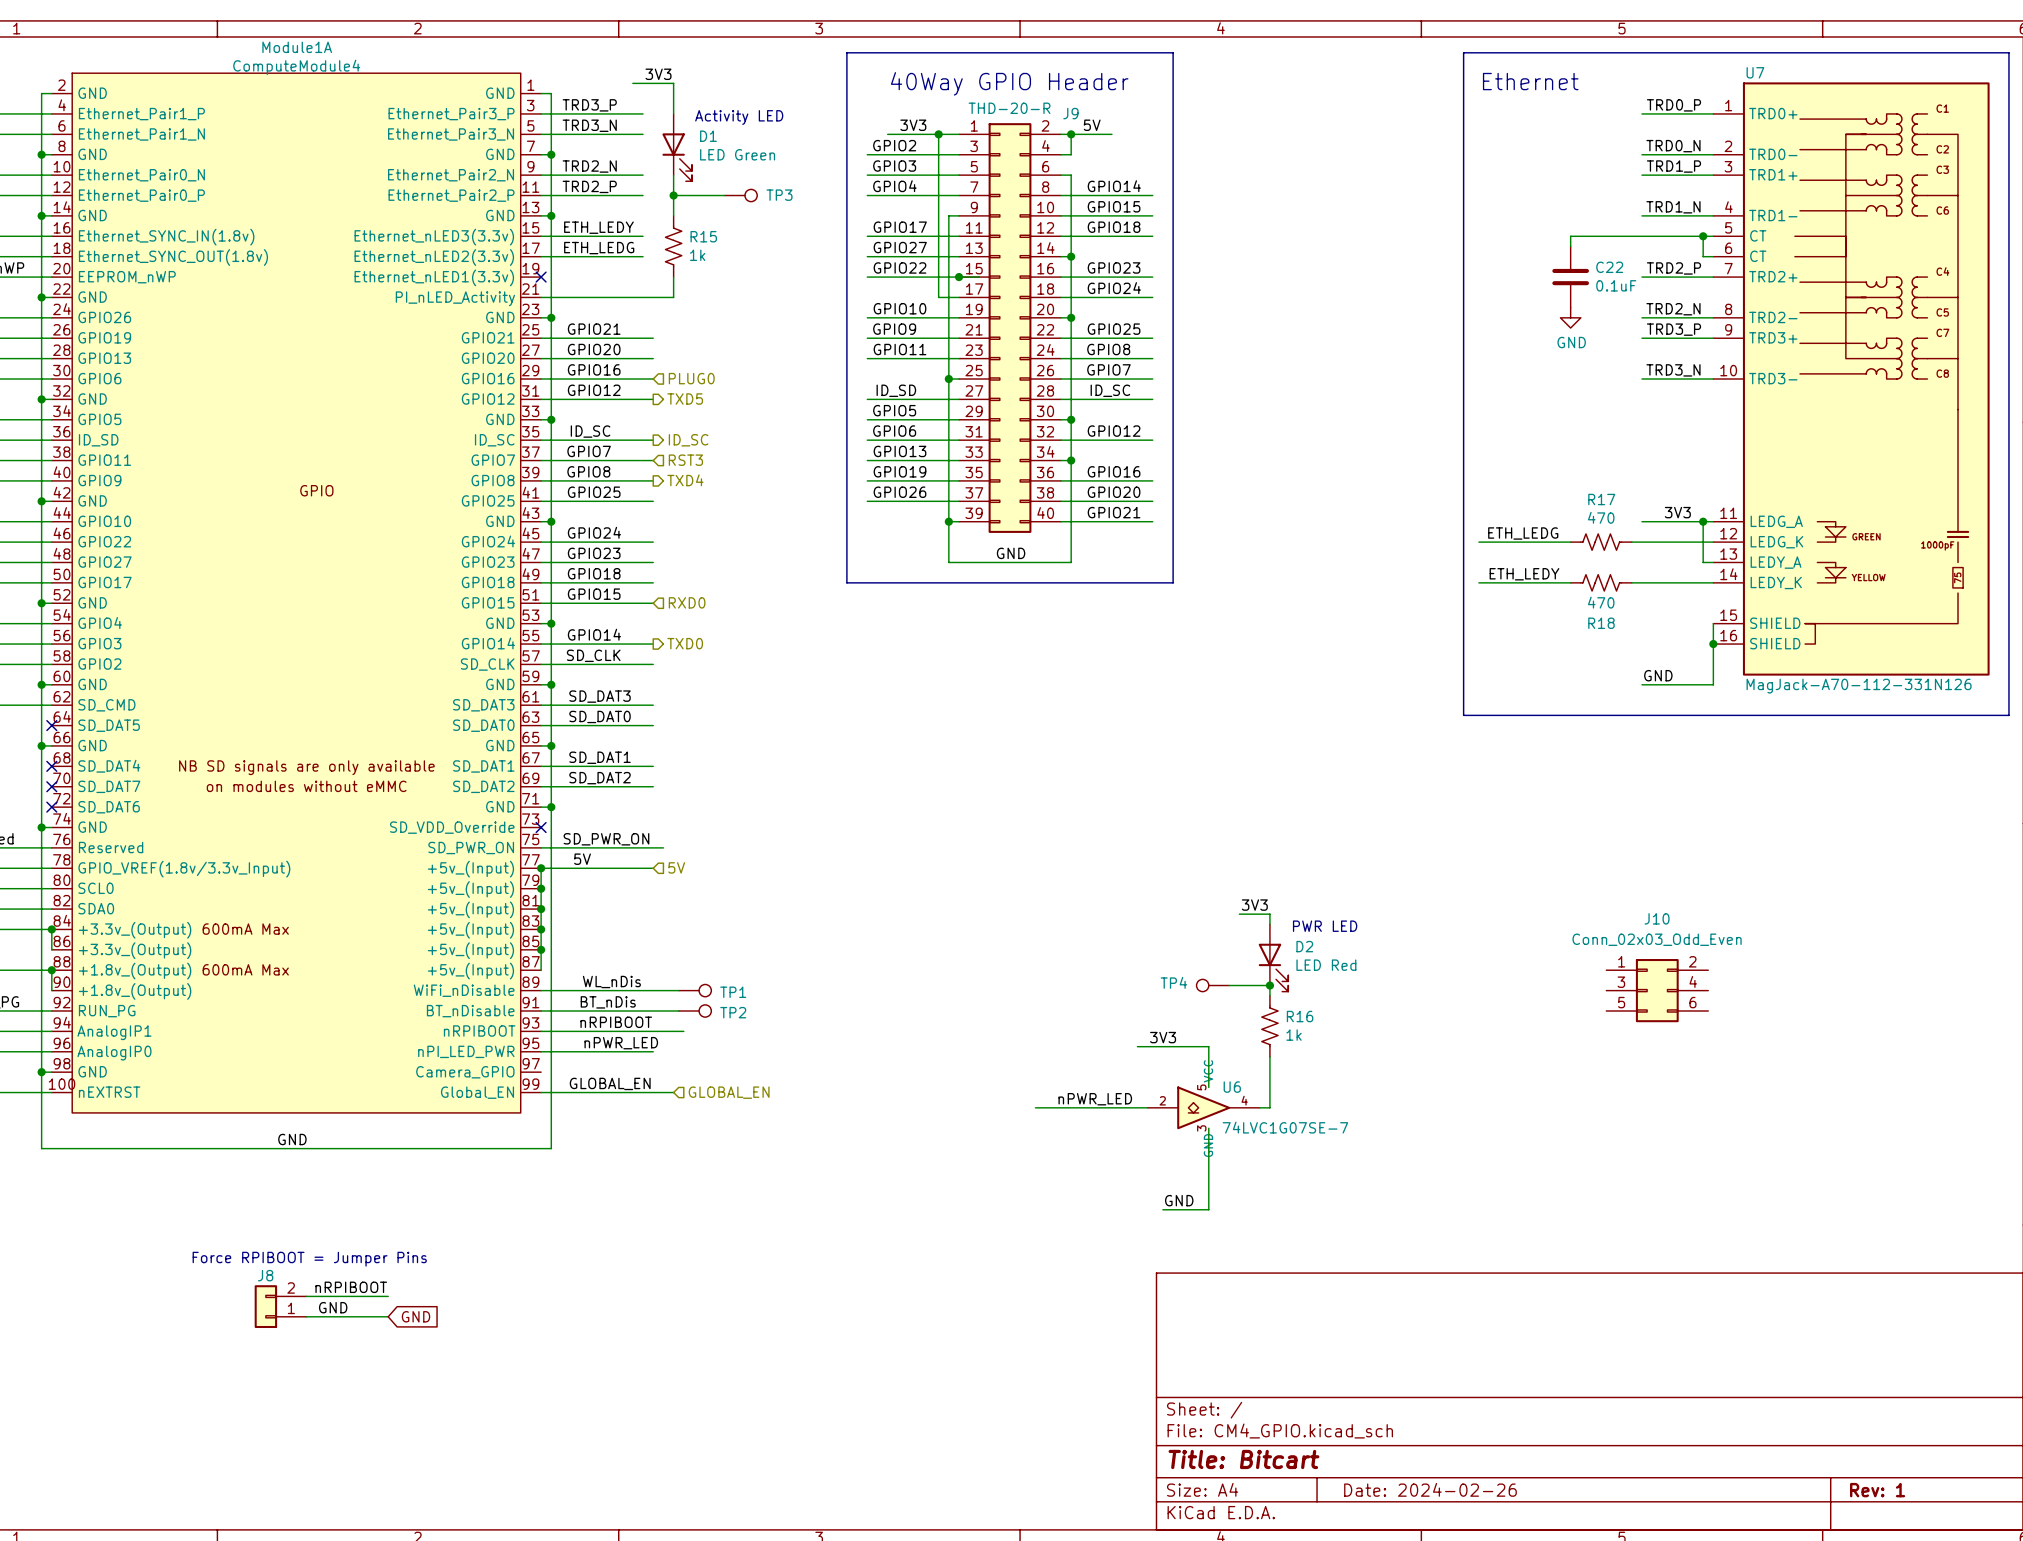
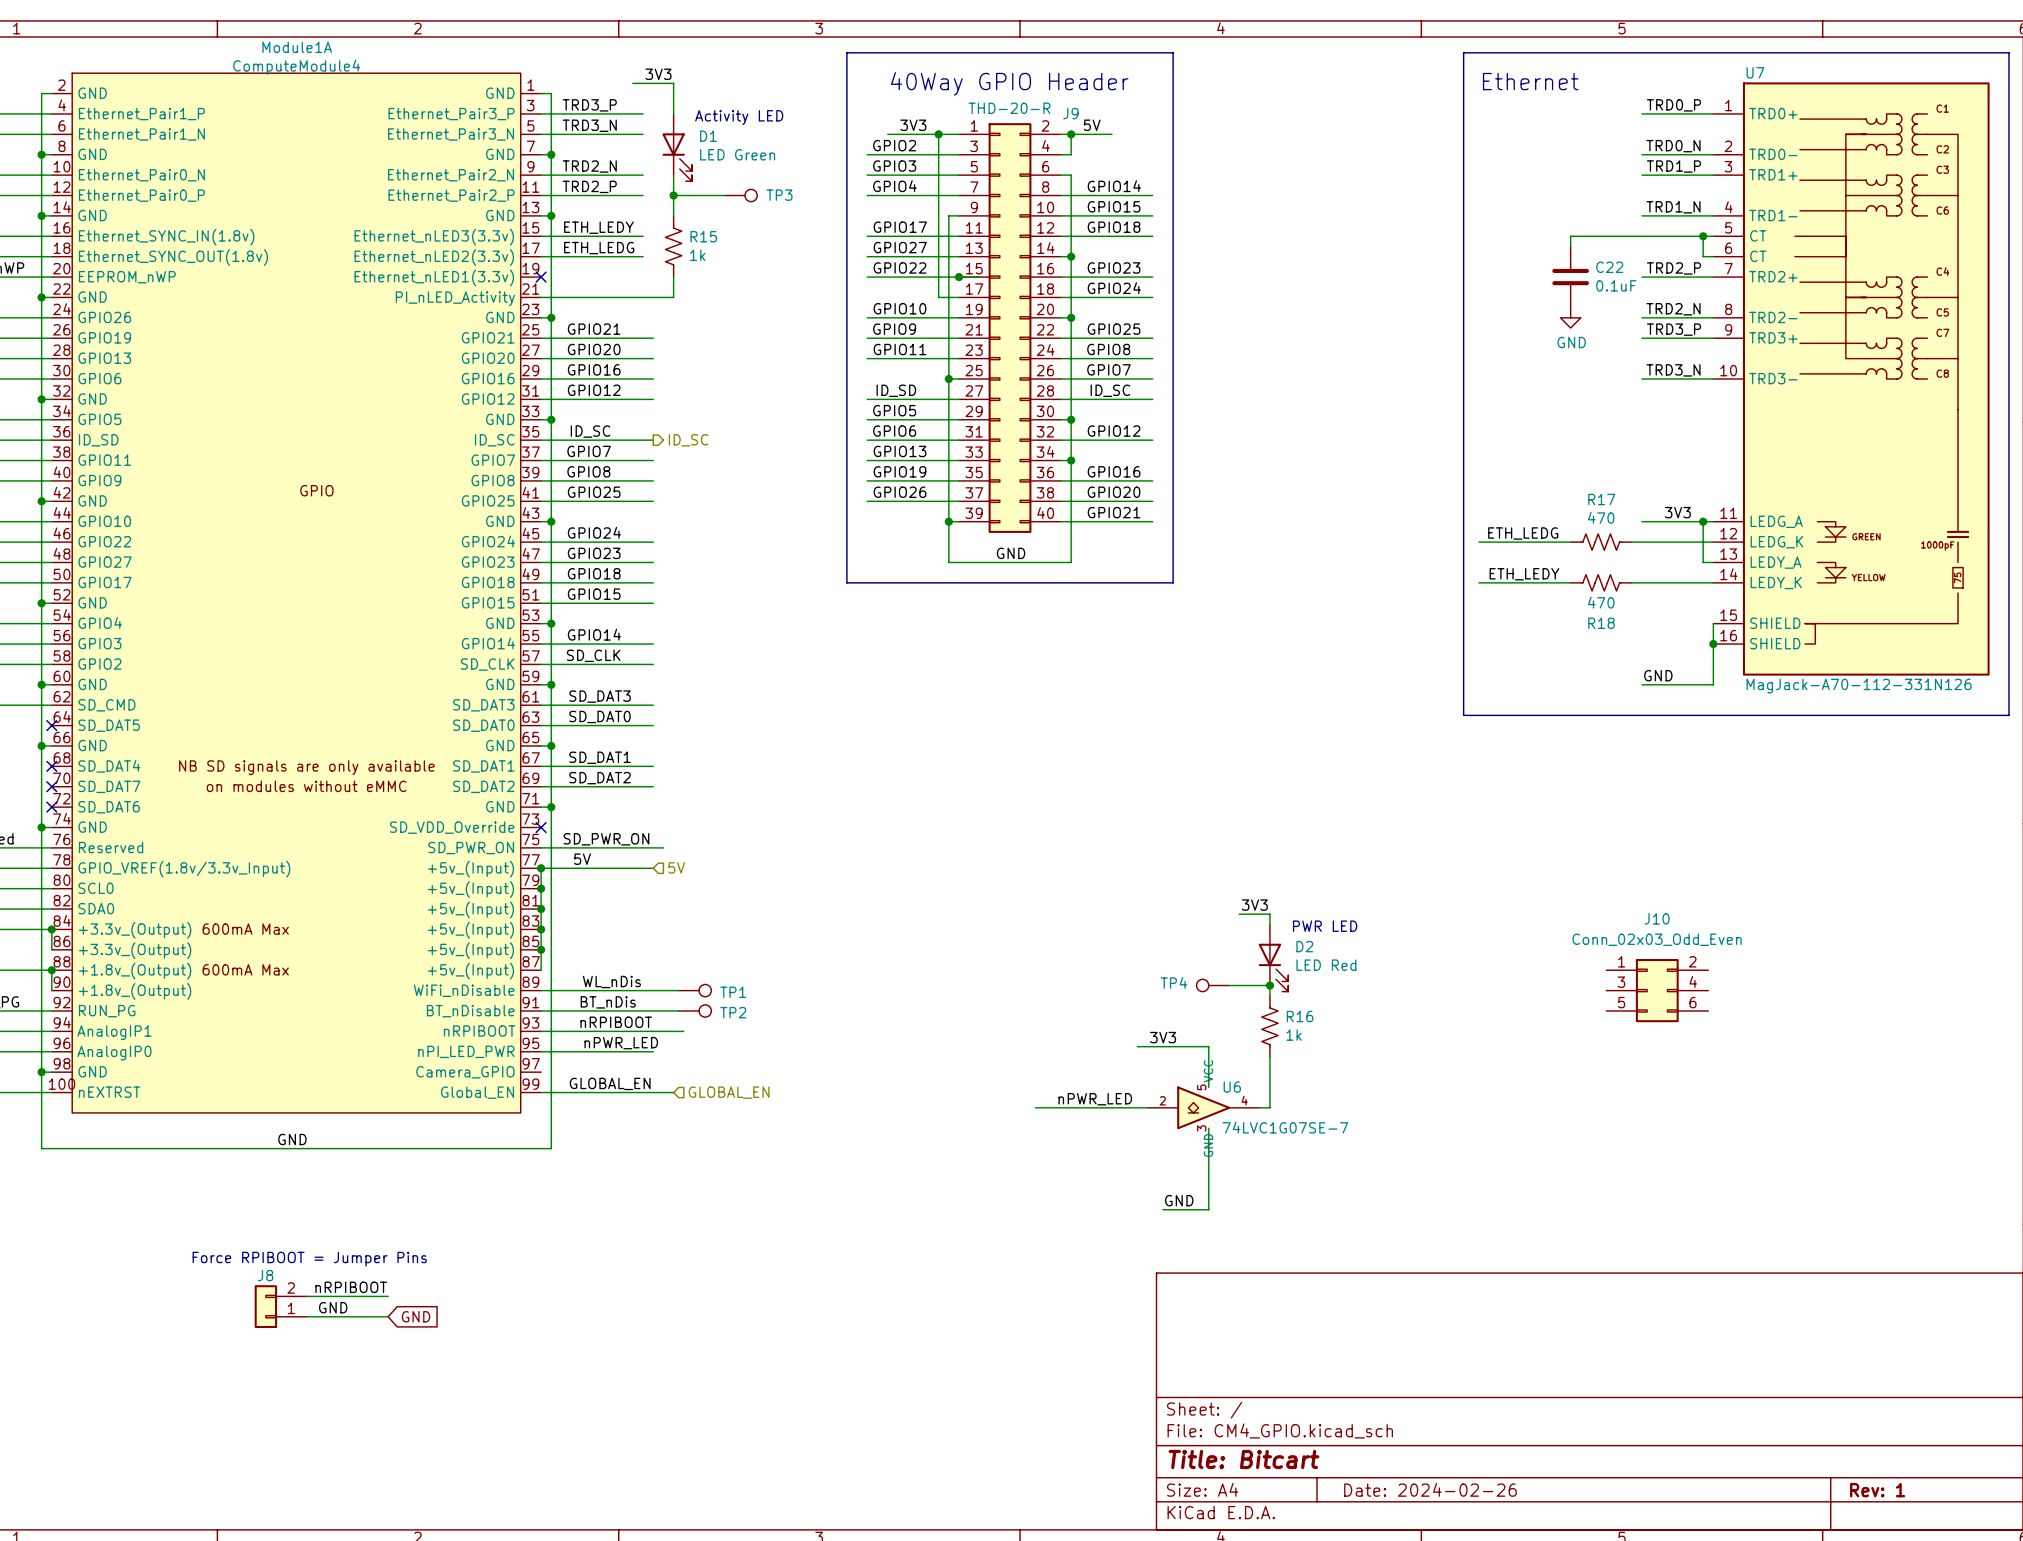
hierarchical label: PLUG0 (691, 378) -> none
hierarchical label: TXD5 (685, 399) -> none
hierarchical label: RST3 (685, 460) -> none
hierarchical label: TXD4 (685, 480) -> none
hierarchical label: RXD0 (687, 602) -> none
hierarchical label: TXD0 (685, 643) -> none

